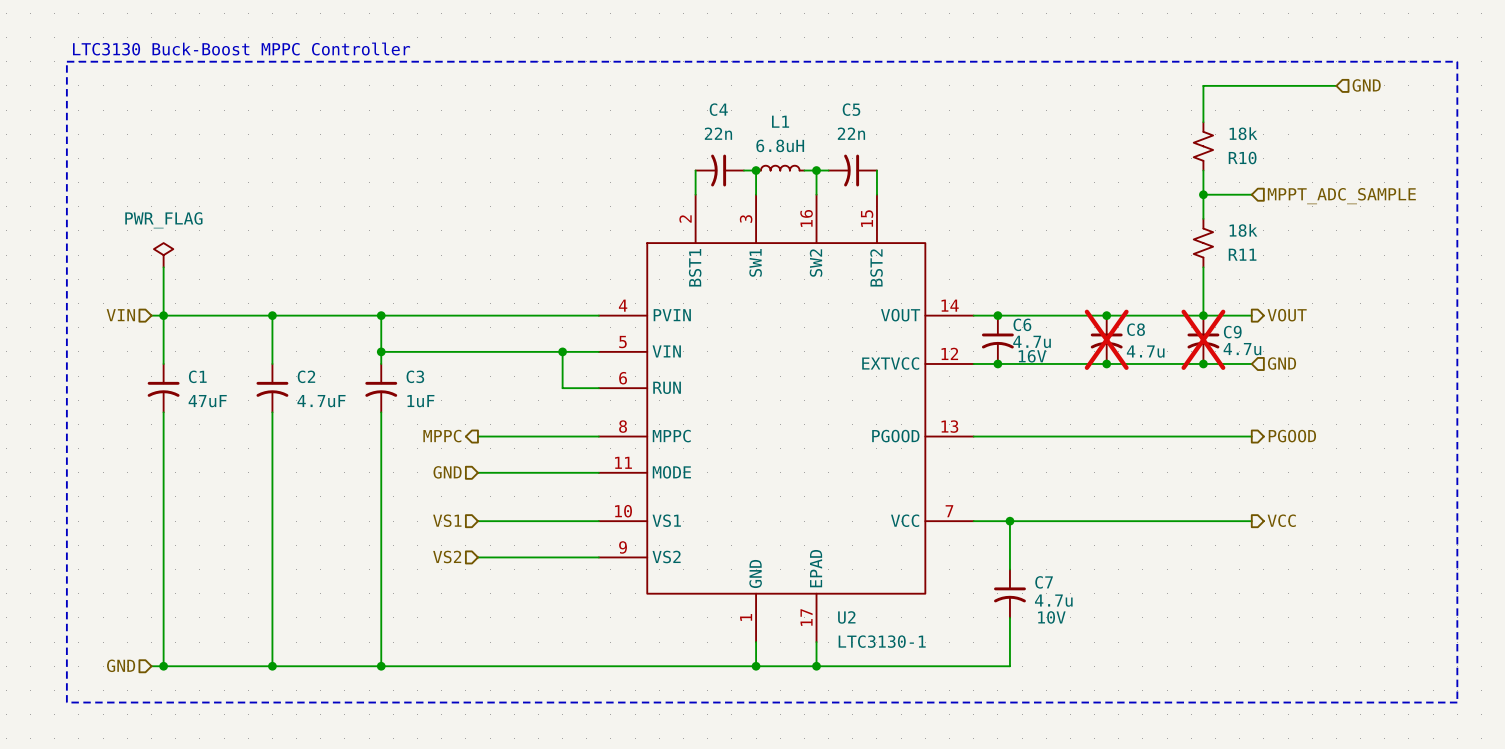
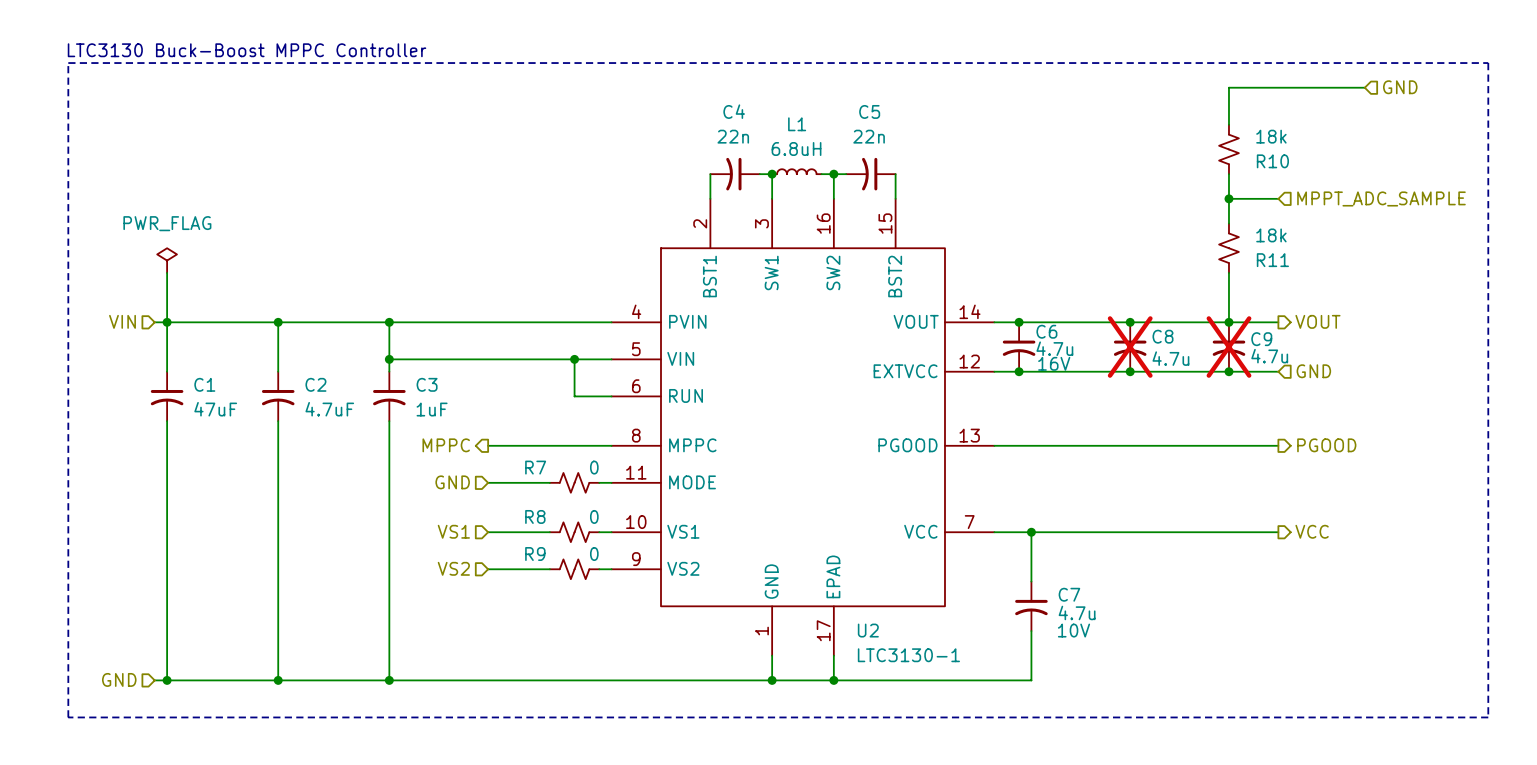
R7: none -> 0 (574, 482)
R8: none -> 0 (574, 532)
R9: none -> 0 (574, 569)

